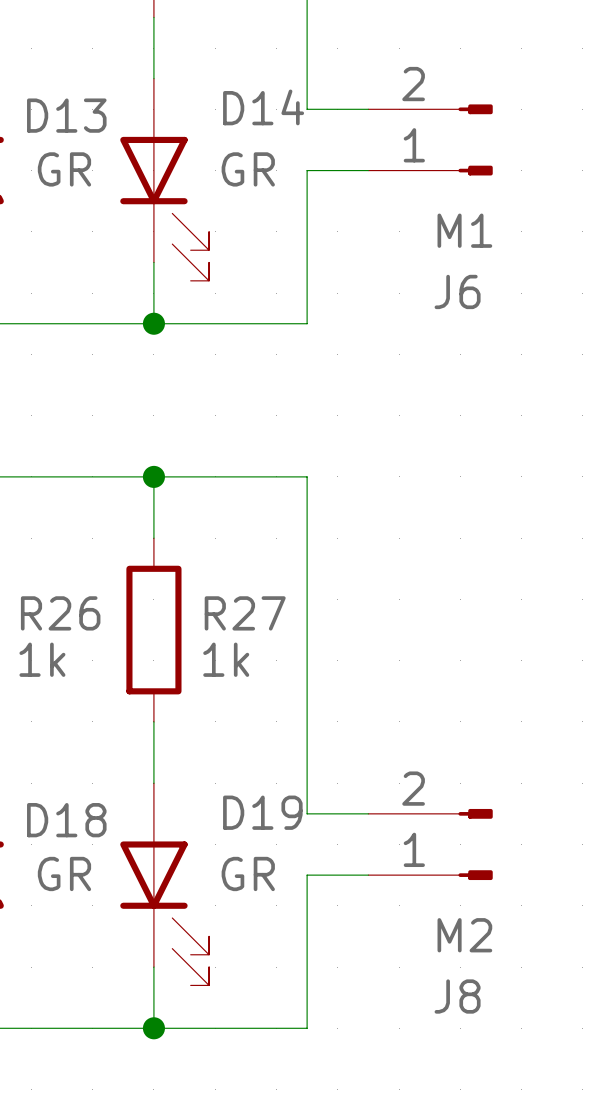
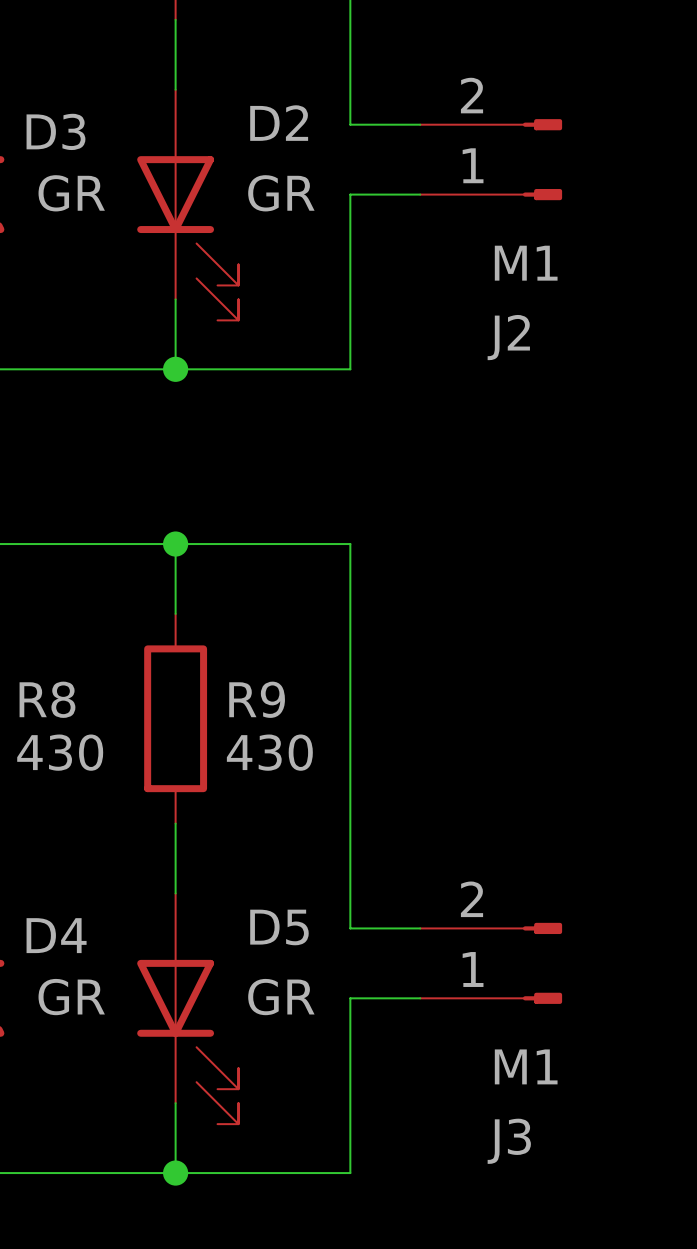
D14 name: D14 (263, 107) -> D2 (279, 123)
D13 name: D13 (66, 115) -> D3 (55, 131)
J6 name: J6 (457, 291) -> J2 (508, 337)
R26 name: R26 (60, 613) -> R8 (47, 699)
R27 name: R27 (245, 613) -> R9 (257, 699)
R26 value: 1k (42, 659) -> 430 (60, 752)
R27 value: 1k (226, 659) -> 430 (269, 752)
D19 name: D19 (262, 812) -> D5 (279, 927)
D18 name: D18 (66, 820) -> D4 (56, 935)
J8 value: M2 (464, 935) -> M1 (526, 1066)
J8 name: J8 (457, 996) -> J3 (509, 1141)

